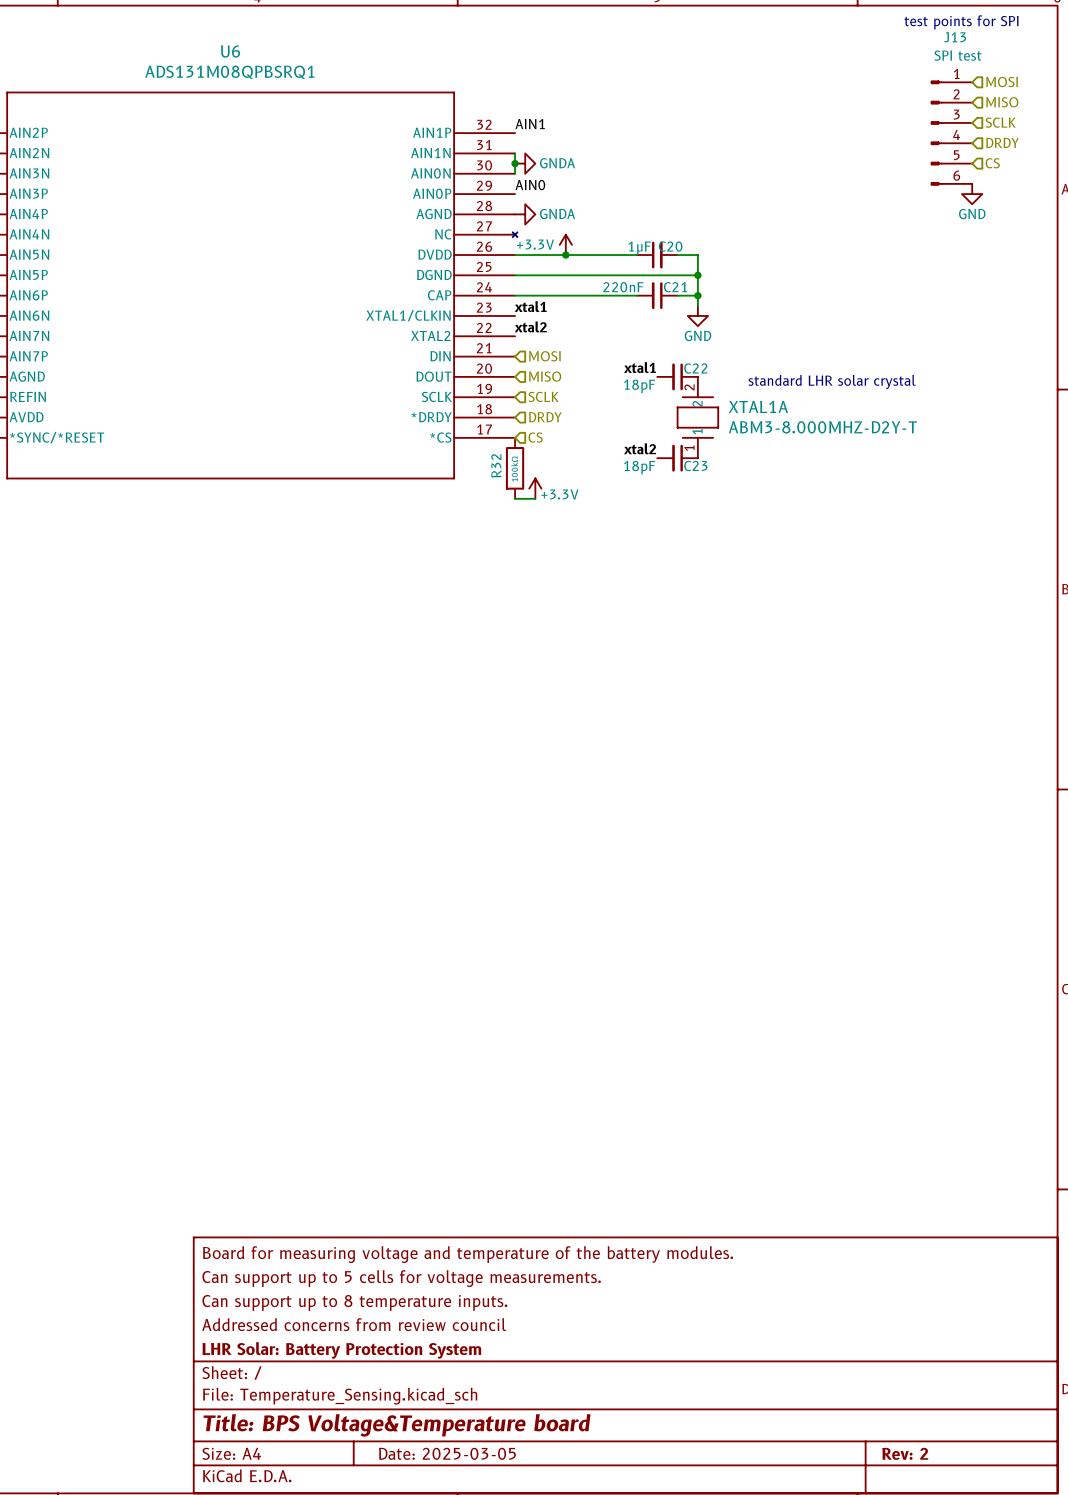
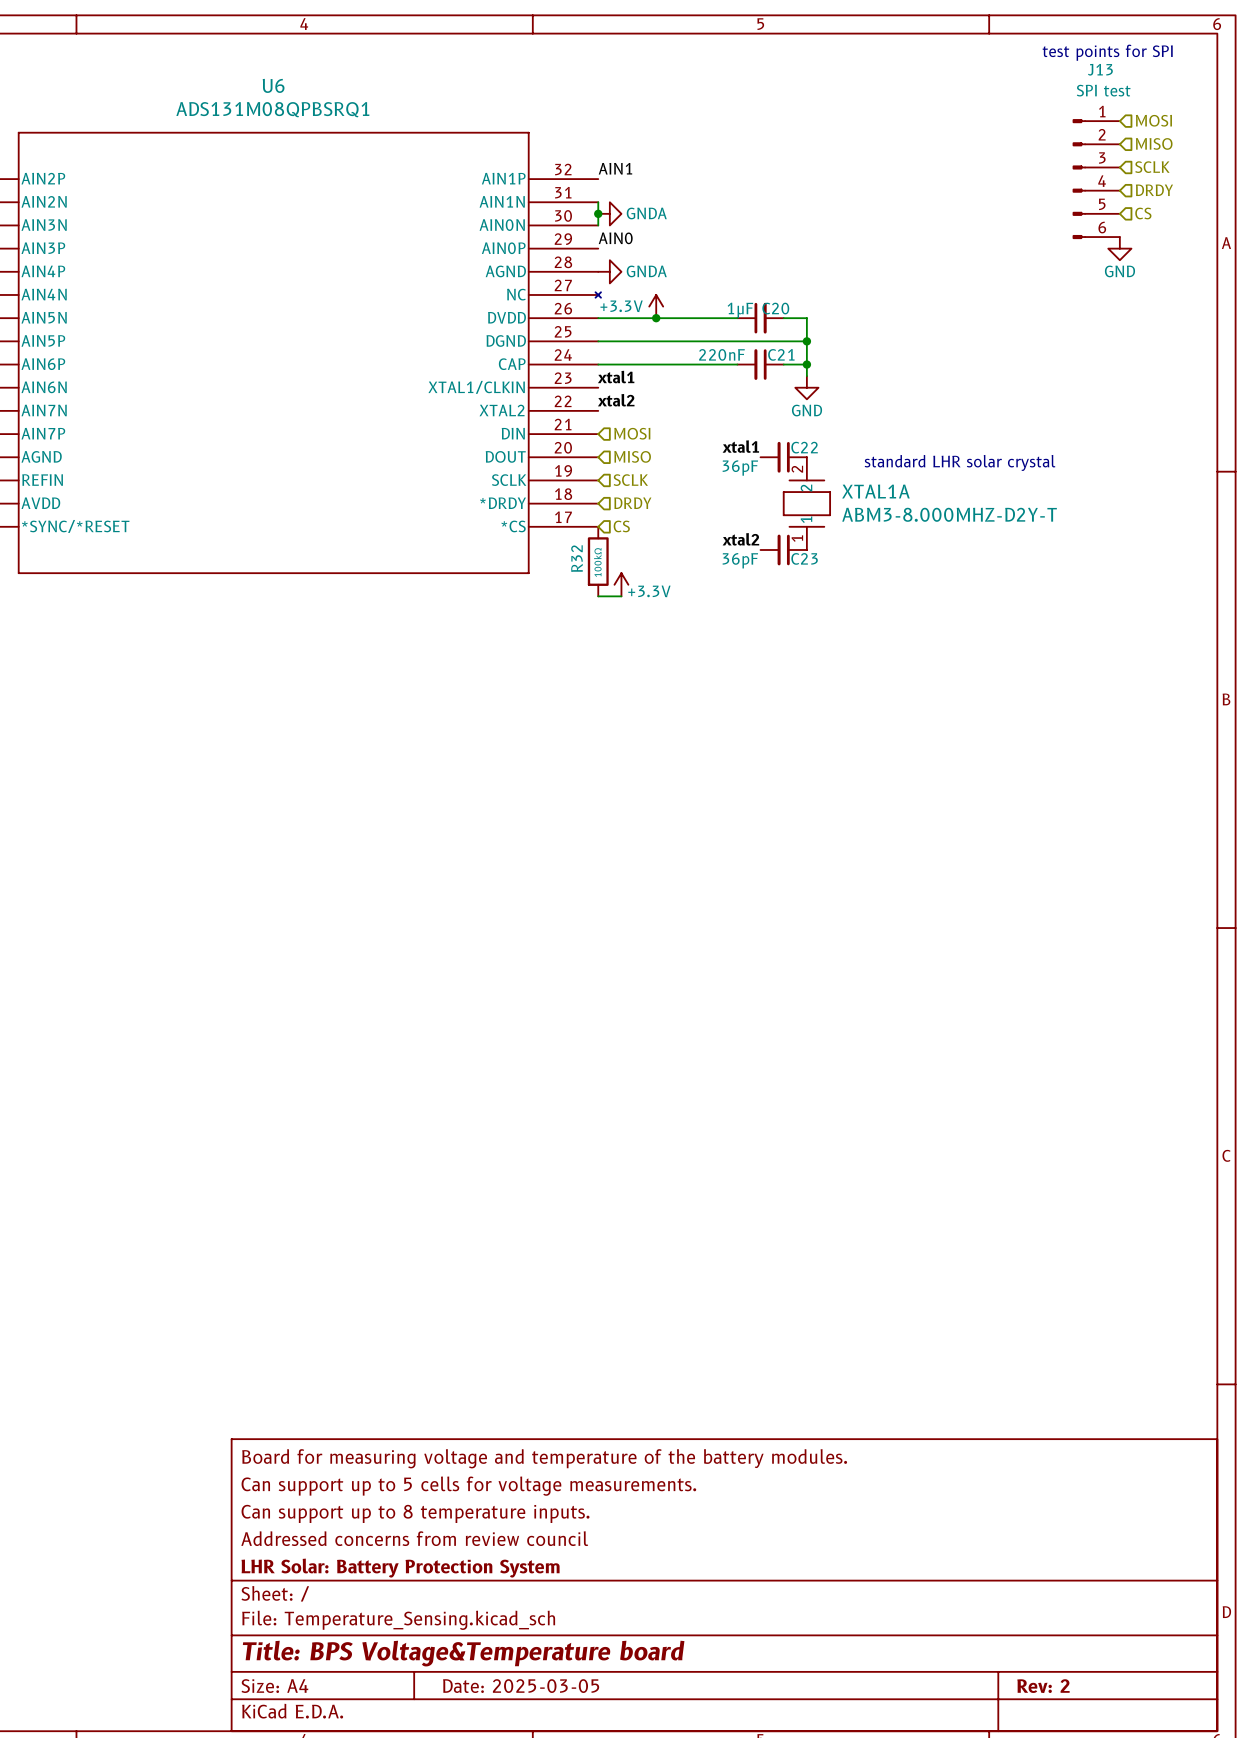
C22 value: 18pF (639, 386) -> 36pF (740, 468)
C23 value: 18pF (639, 467) -> 36pF (740, 560)

